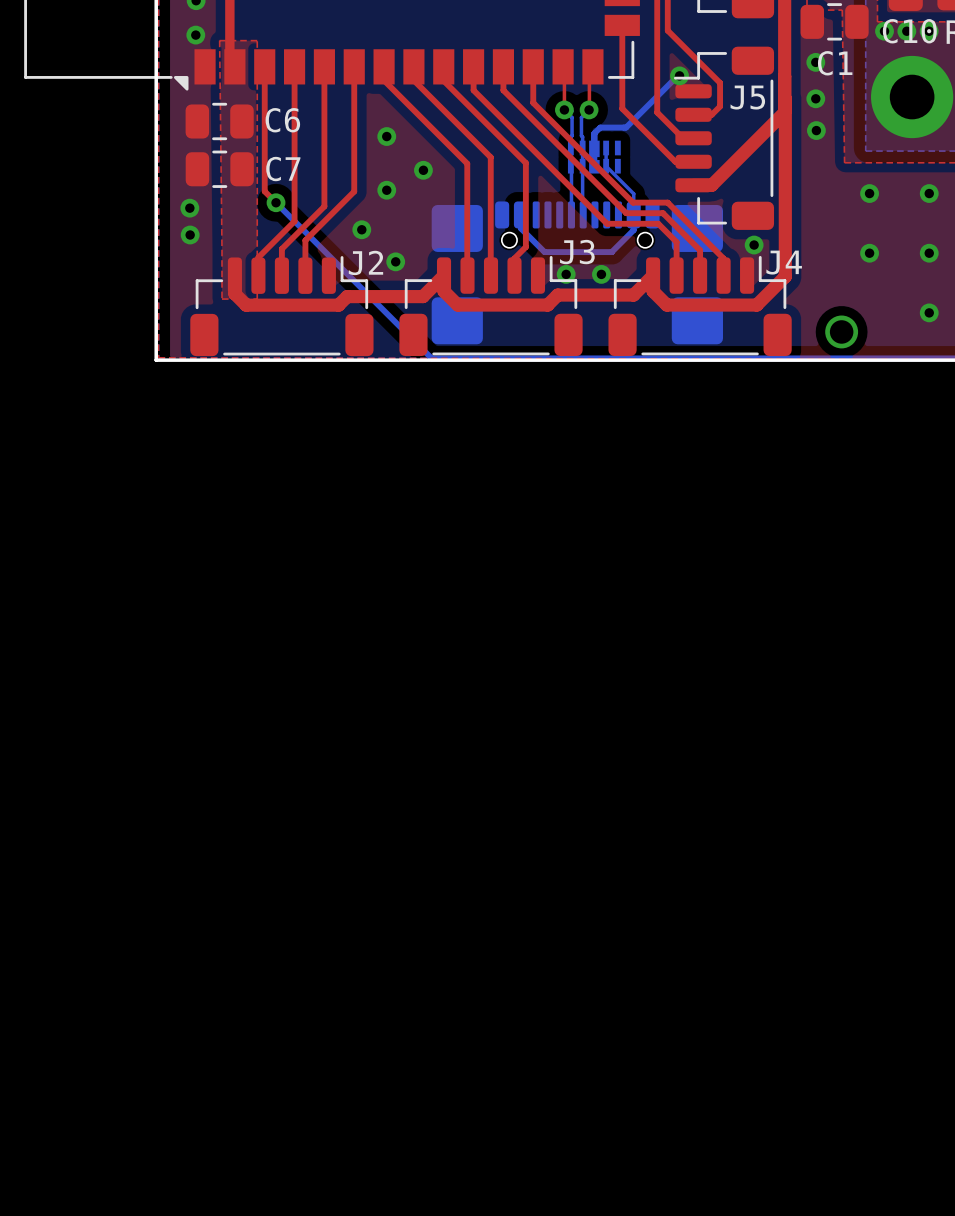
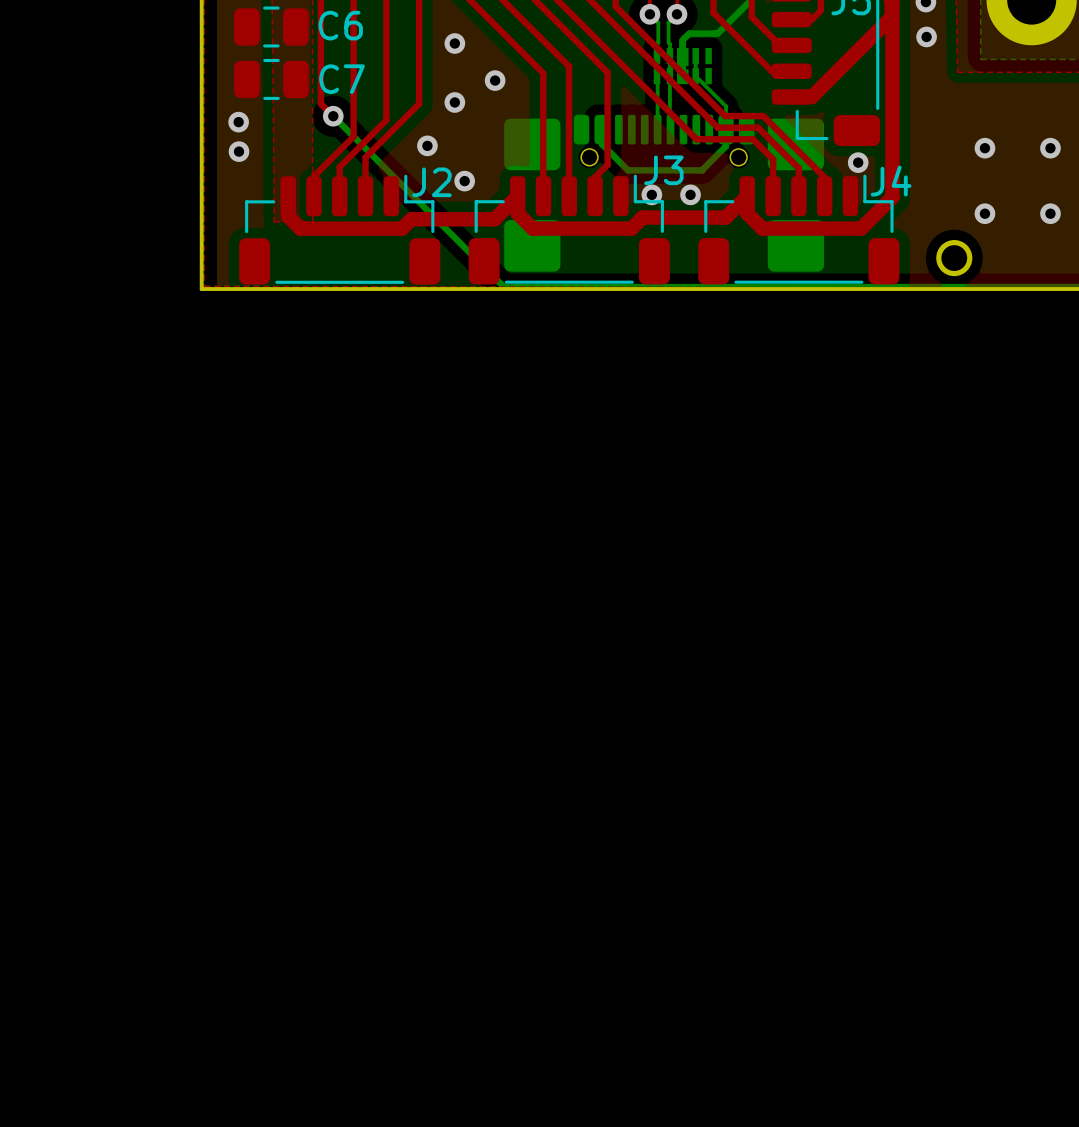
via: (869, 193) -> none
via: (929, 193) -> none
via: none -> (984, 148)
via: none -> (1050, 148)
via: (869, 253) -> none
via: (929, 253) -> none
via: none -> (984, 213)
via: none -> (1050, 213)
via: (929, 312) -> none

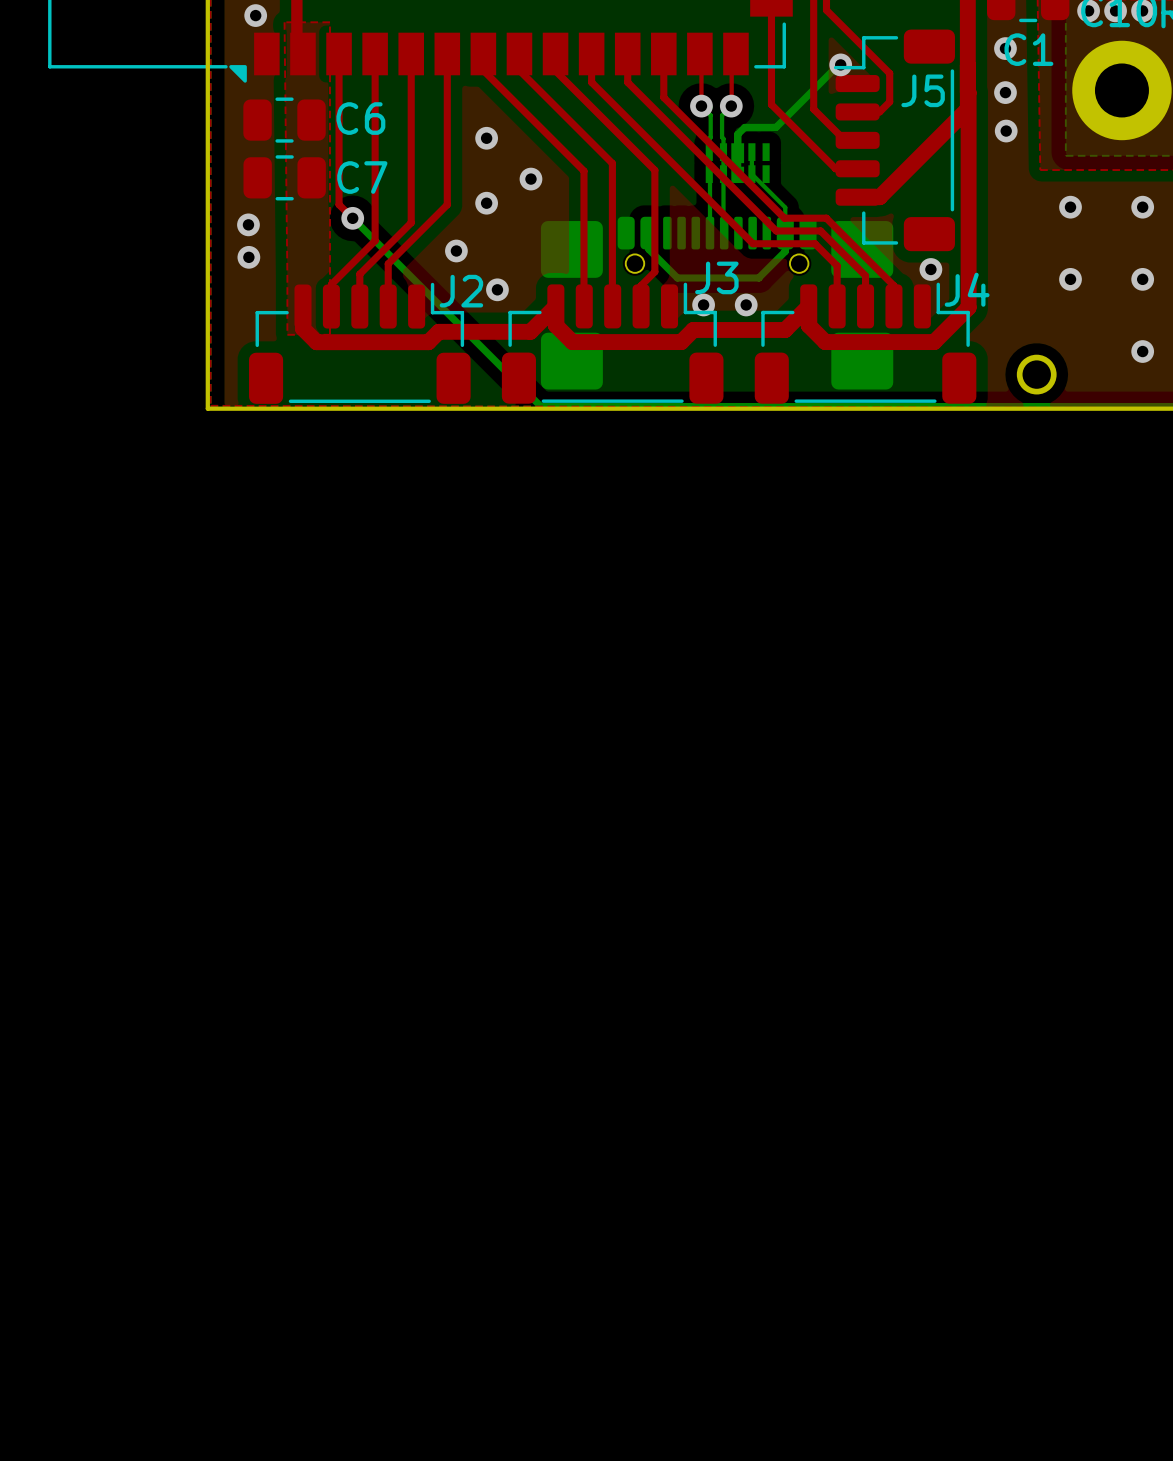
via: none -> (1070, 207)
via: none -> (1142, 207)
via: (984, 148) -> none
via: (1050, 148) -> none
via: none -> (1070, 279)
via: none -> (1142, 279)
via: (984, 213) -> none
via: (1050, 213) -> none
via: none -> (1142, 351)

